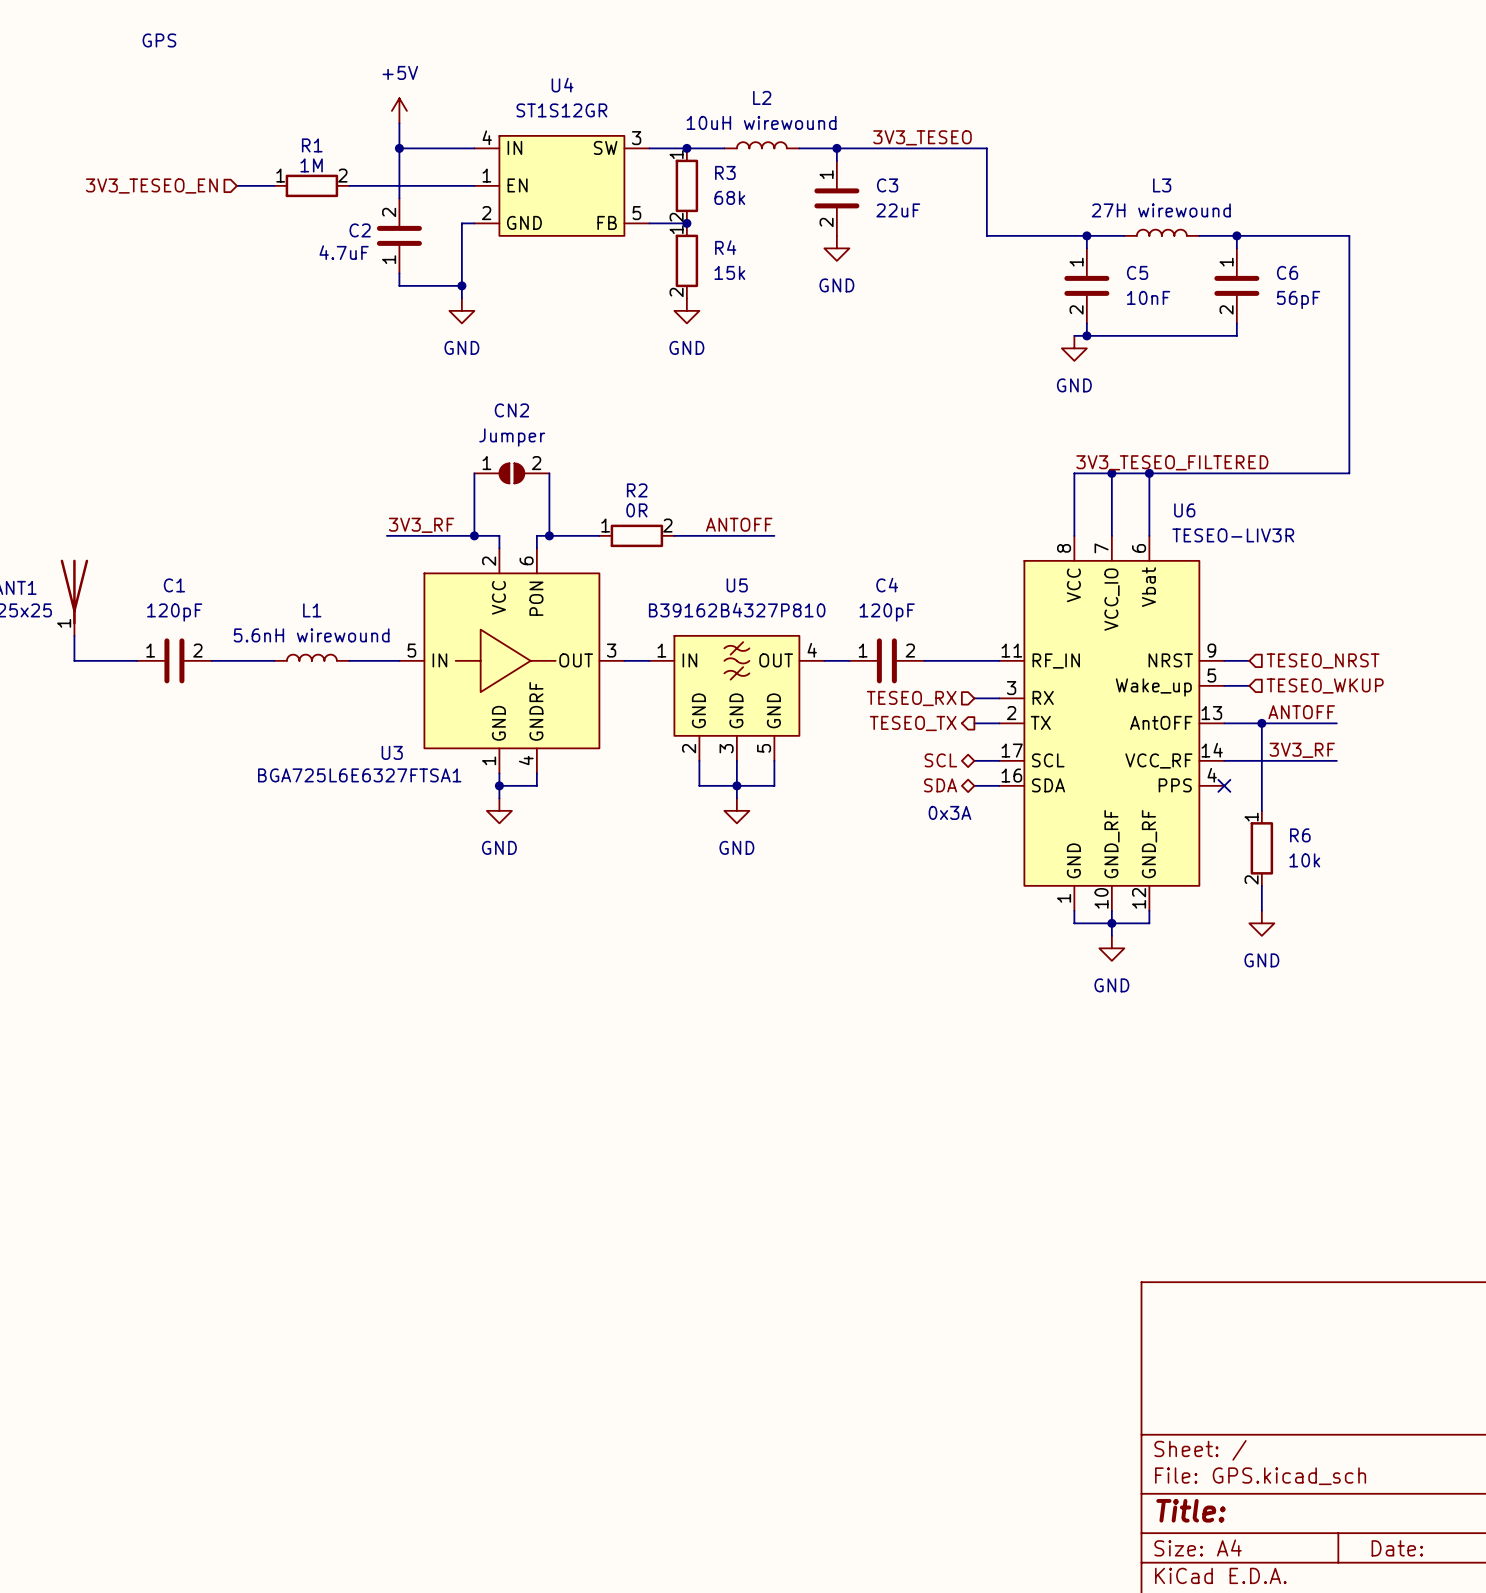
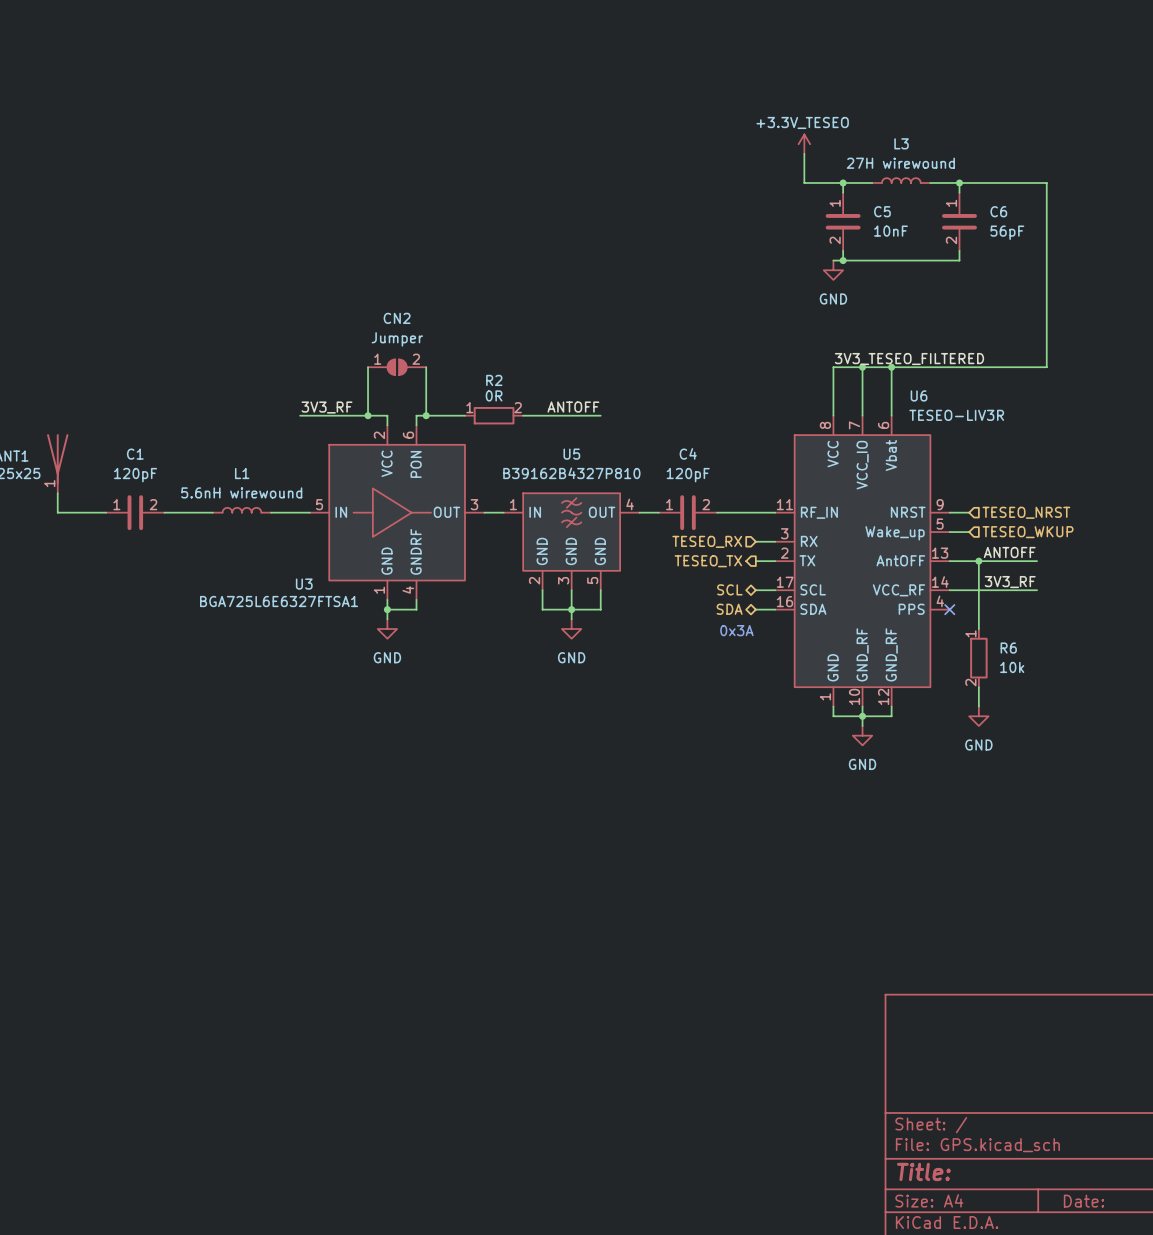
text: GPS (159, 40) -> none
power symbol: +5V (399, 110) -> none
wire: (399, 123) (399, 198) -> none
label: 3V3_TESEO (922, 137) -> none
L2: (761, 145) -> none
wire: (399, 148) (474, 148) -> none
junction: (399, 148) -> none
wire: (649, 148) (724, 148) -> none
junction: (686, 148) -> none
wire: (799, 148) (986, 148) (986, 235) (1036, 235) -> (804, 153) (804, 182)
wire: (836, 148) (836, 160) -> none
junction: (836, 148) -> none
wire: (236, 185) (274, 185) -> none
R1: (311, 185) -> none
wire: (349, 185) (474, 185) -> none
U4: (561, 185) -> none
R3: (686, 185) -> none
power symbol: none -> +3.3V_TESEO (804, 144)
hierarchical label: 3V3_TESEO_EN (151, 186) -> none
C3: (836, 198) -> none
wire: (474, 223) (461, 223) (461, 298) -> none
wire: (649, 223) (686, 223) -> none
junction: (686, 223) -> none
C2: (399, 235) -> none
power symbol: GND (836, 248) -> none
R4: (686, 260) -> none
wire: (399, 273) (399, 285) (461, 285) -> none
junction: (461, 285) -> none
power symbol: GND (461, 310) -> none
power symbol: GND (686, 310) -> none

